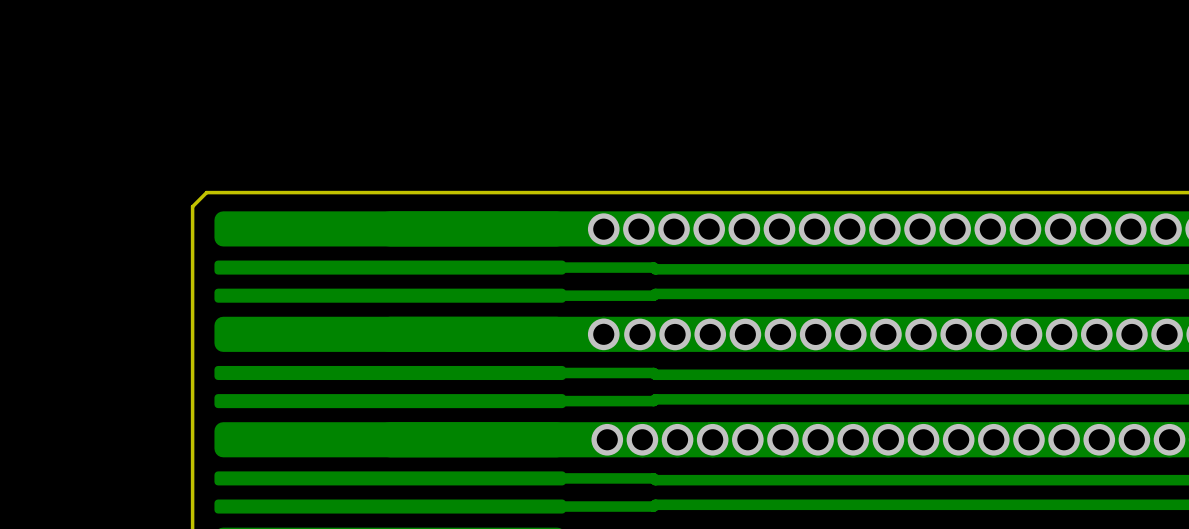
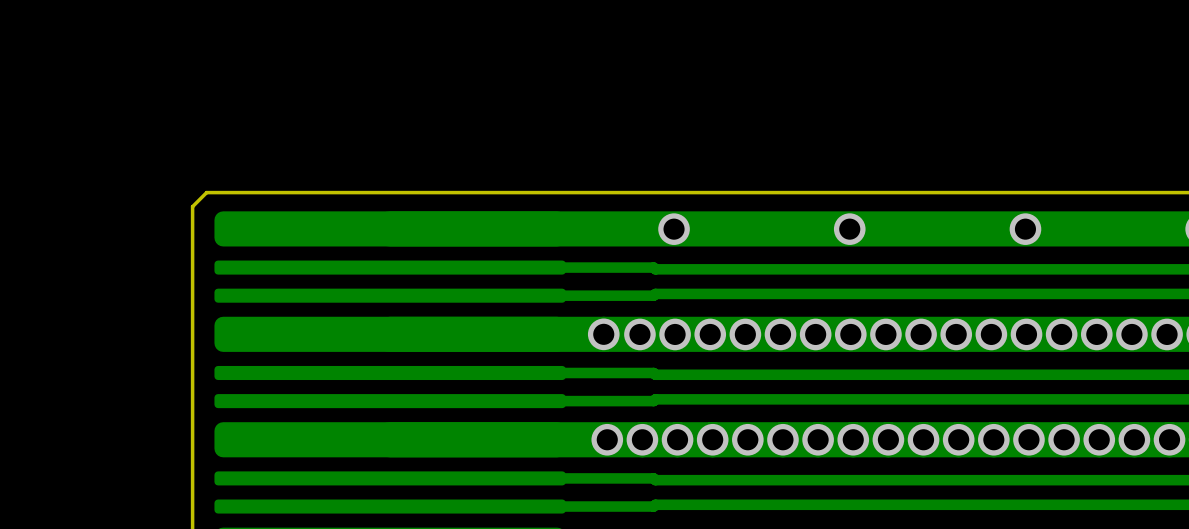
via: (603, 229) -> none
via: (638, 229) -> none
via: (709, 229) -> none
via: (744, 229) -> none
via: (779, 229) -> none
via: (814, 229) -> none
via: (884, 229) -> none
via: (920, 229) -> none
via: (955, 229) -> none
via: (990, 229) -> none
via: (1060, 229) -> none
via: (1095, 229) -> none
via: (1130, 229) -> none
via: (1166, 229) -> none

